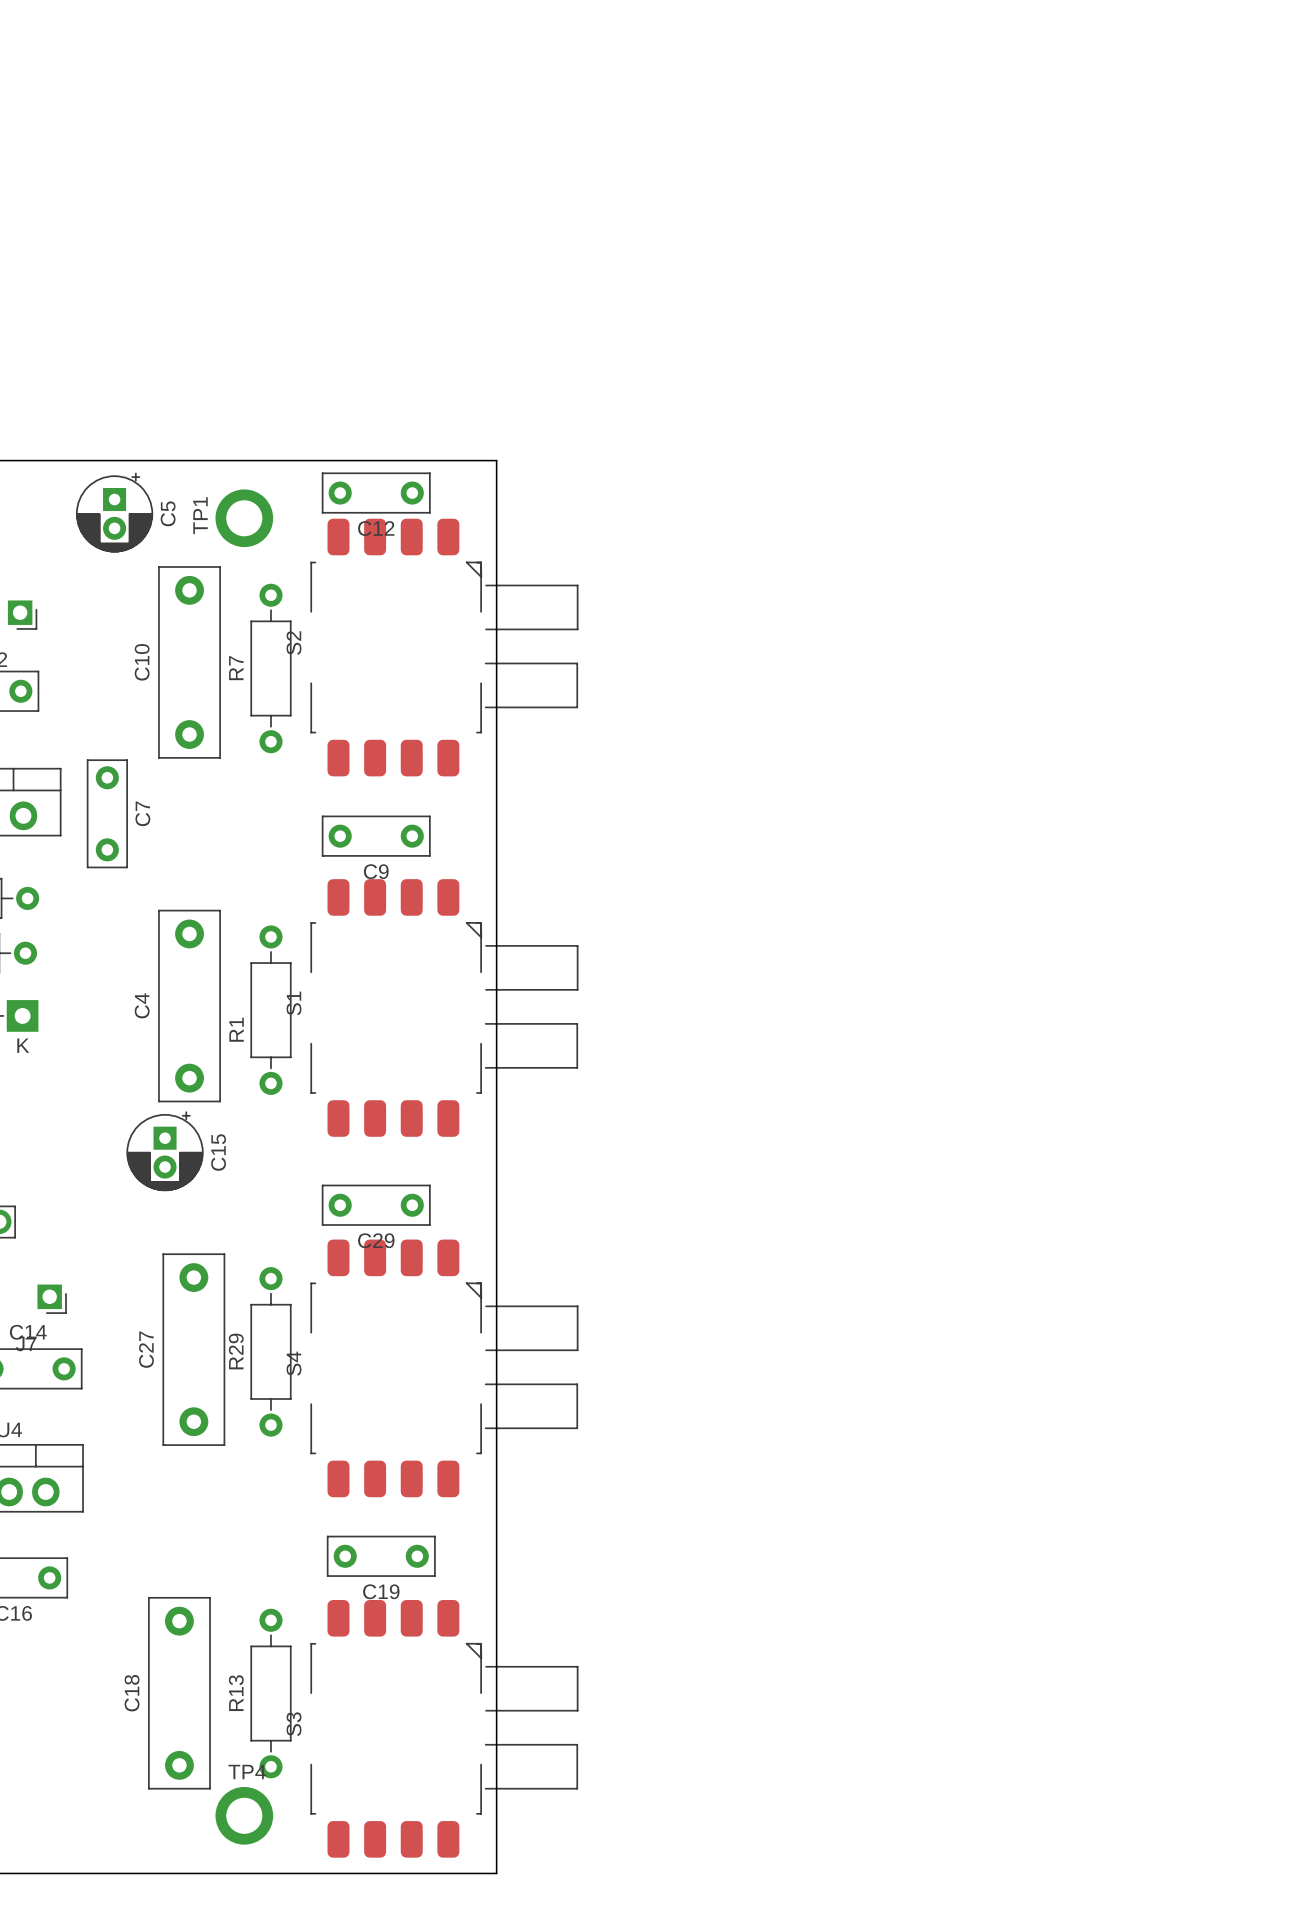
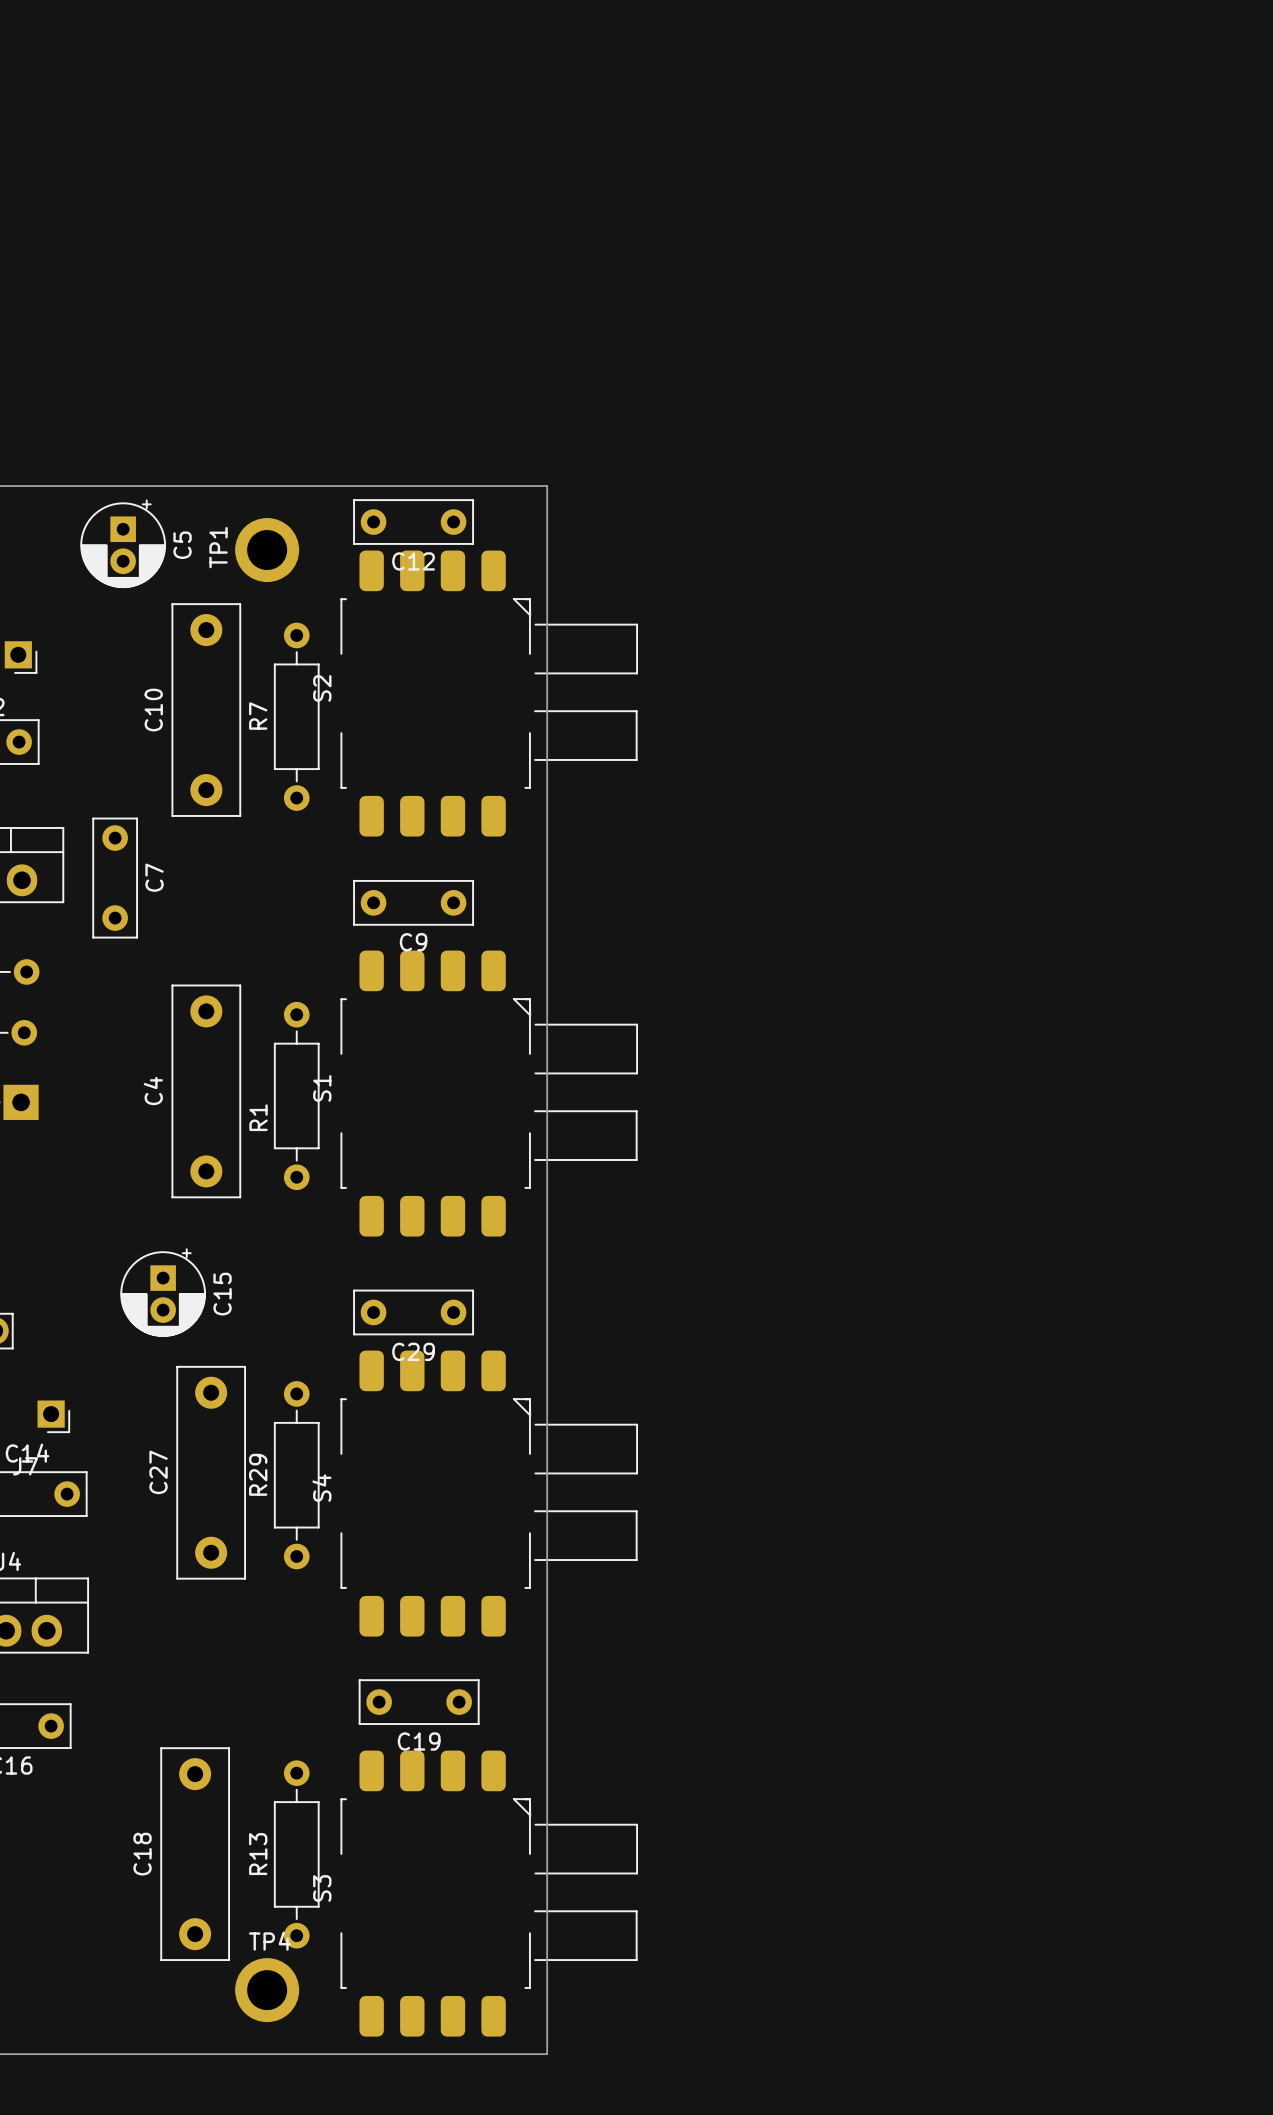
part text: K (23, 1045) -> none
C15 position: (165, 1151) -> (163, 1292)

